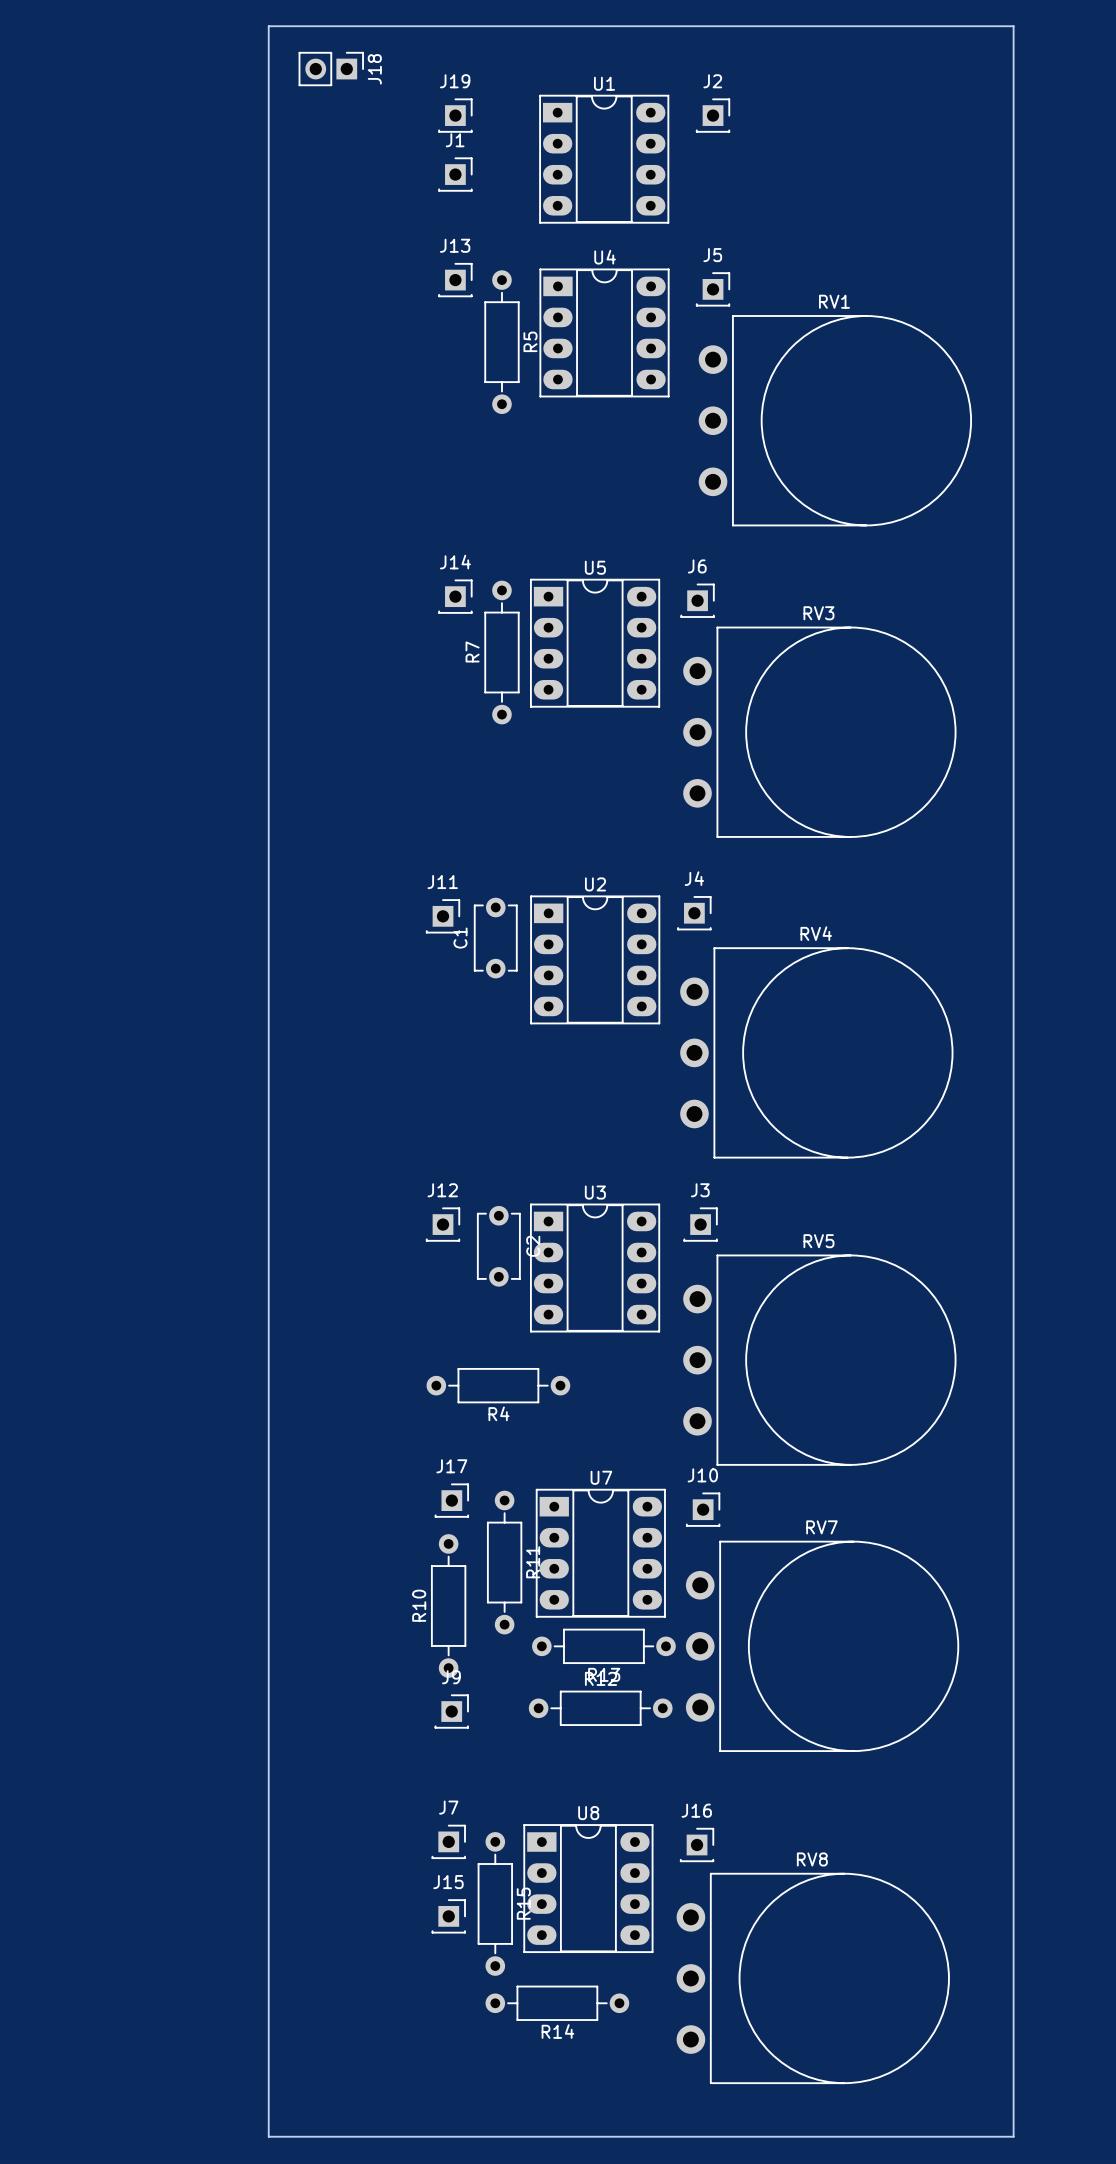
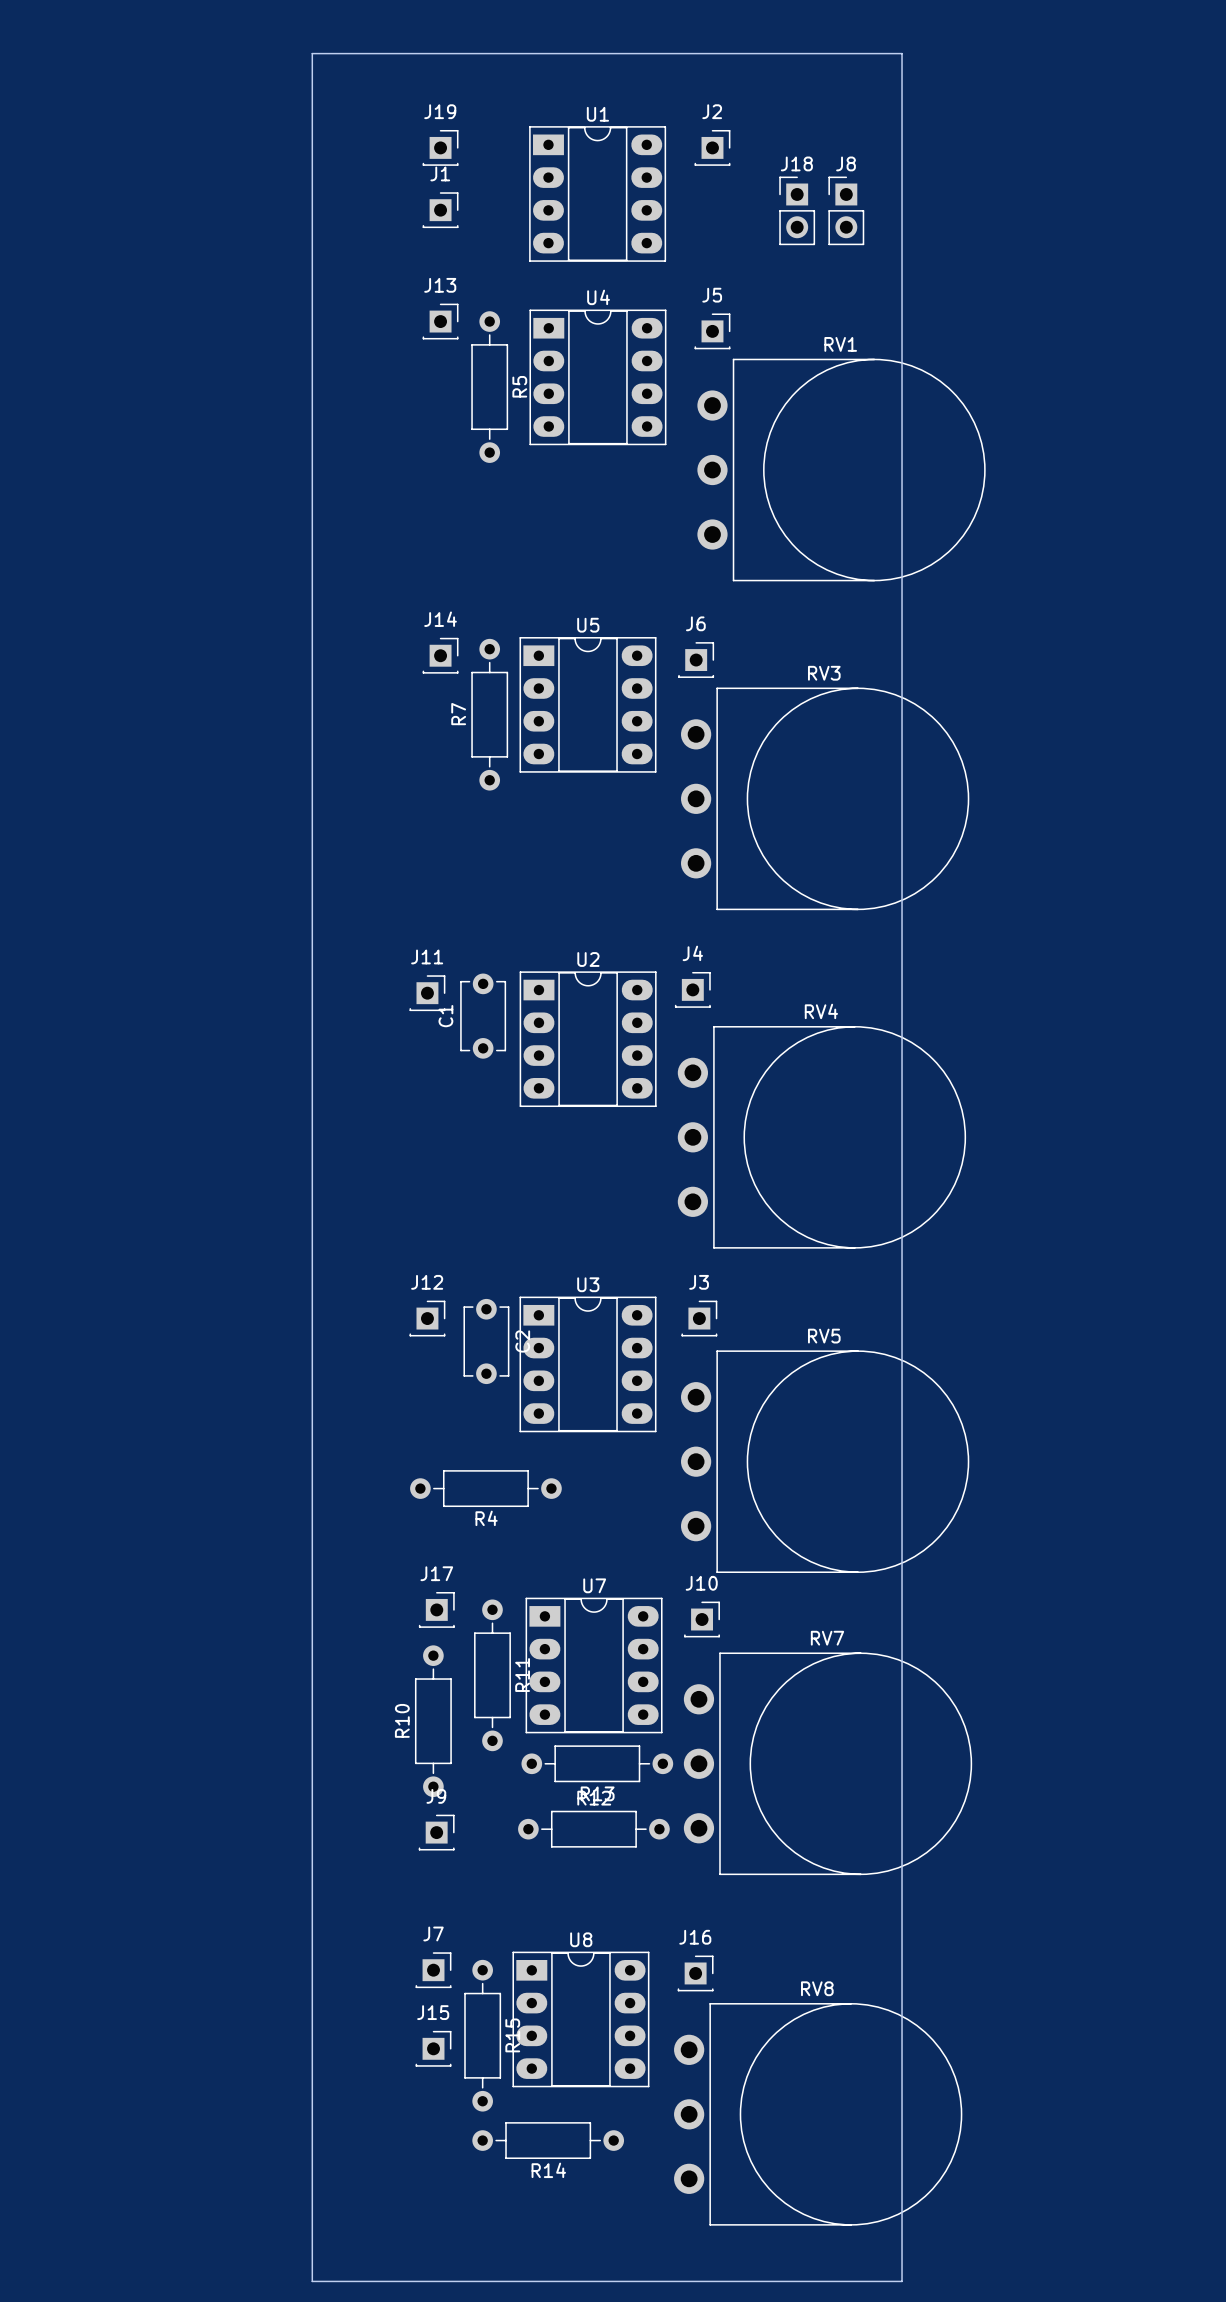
board edge: (333, 26) (268, 26) (268, 2136) (333, 2136) -> (312, 53) (312, 2281)
board edge: (892, 26) (1013, 26) (1013, 2136) (892, 2136) -> (902, 53) (902, 2281)
J18 rotation: 0° (331, 69) -> 90° counterclockwise (797, 210)
J18 position: (331, 69) -> (797, 210)
J8: none -> (846, 210)

